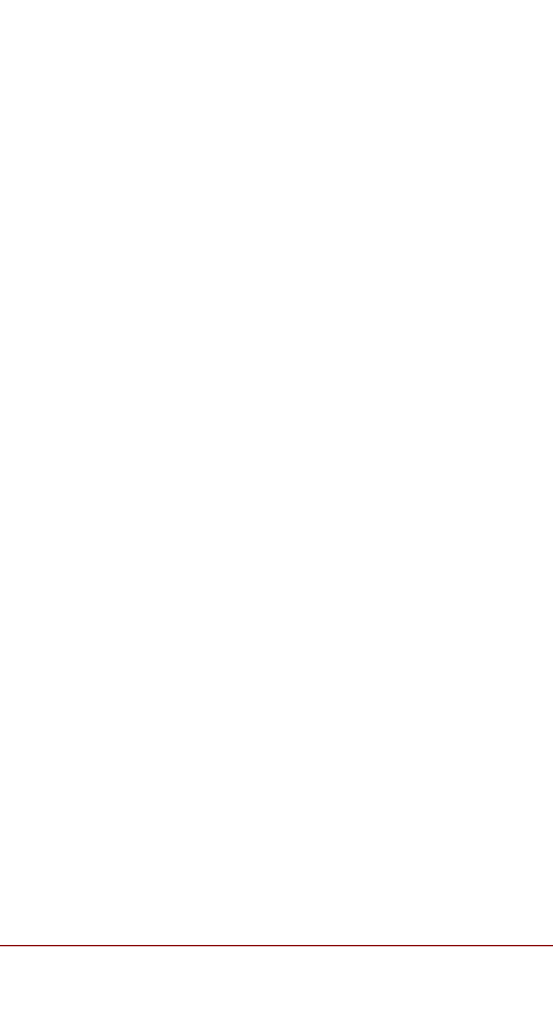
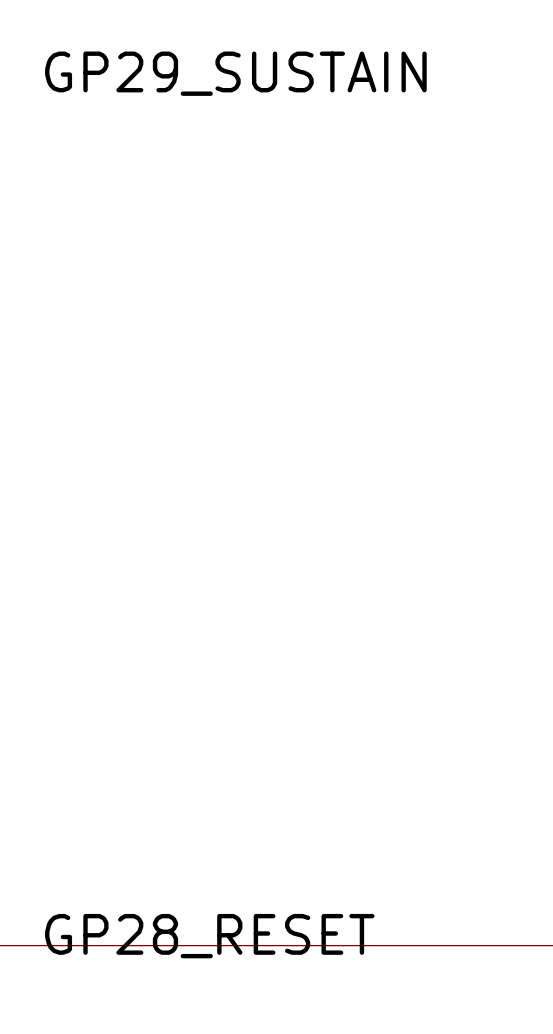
label: none -> GP29_SUSTAIN (235, 73)
label: none -> GP28_RESET (209, 936)

